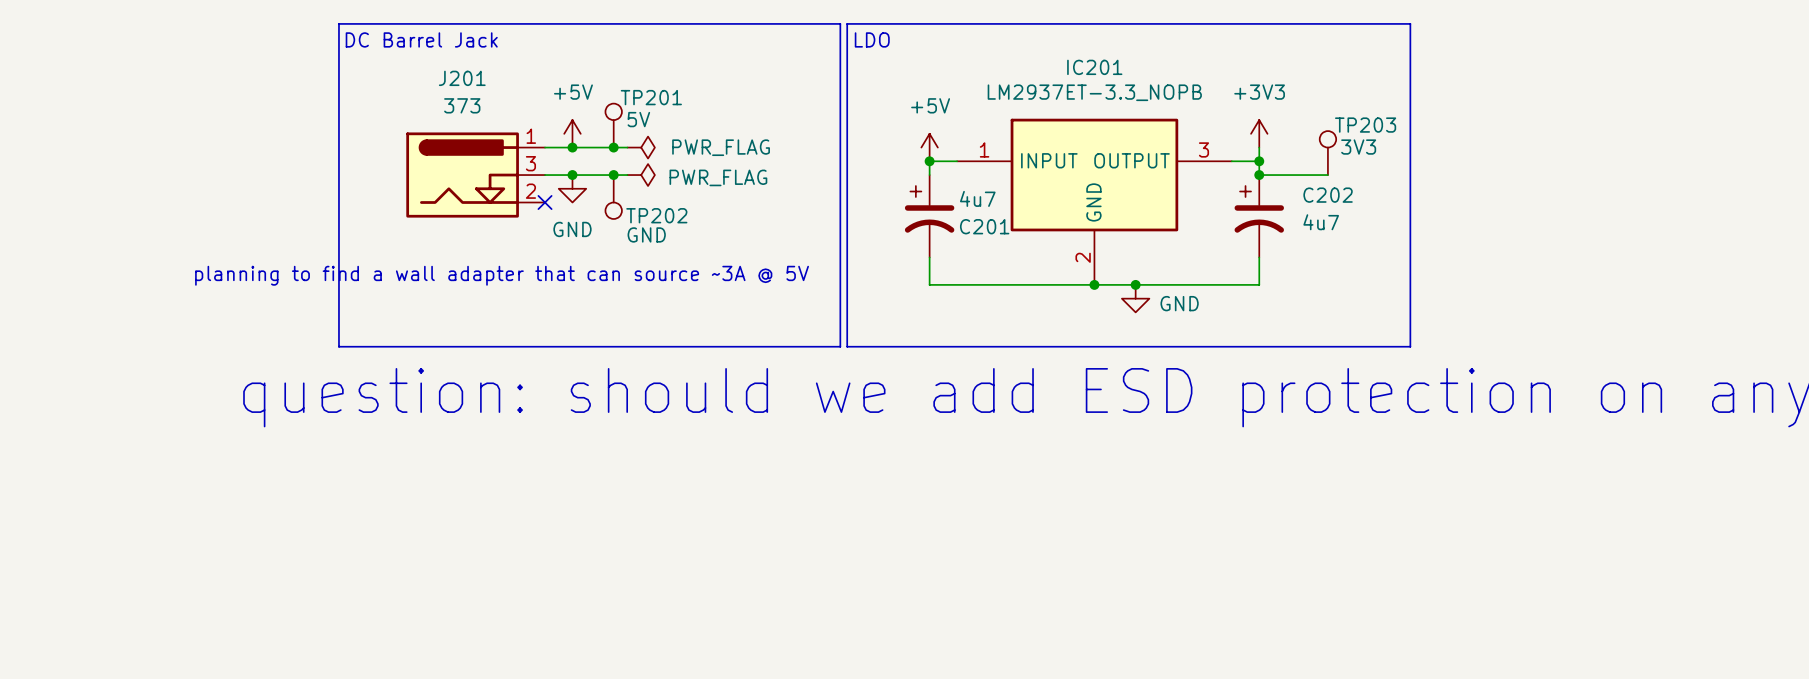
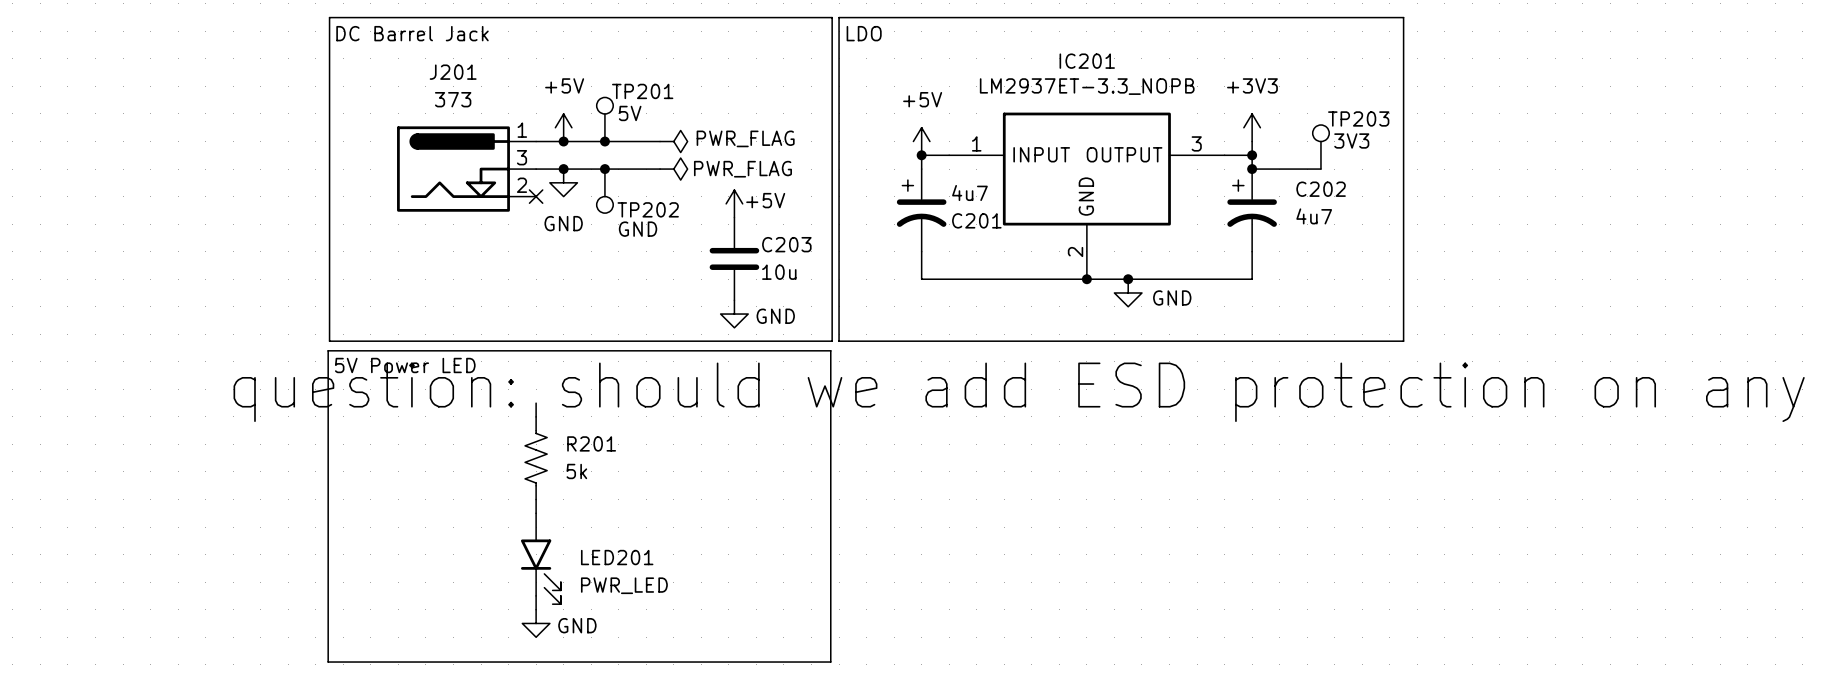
wire: none -> (618, 141) (660, 141)
power symbol: PWR_FLAG (641, 147) -> none
power symbol: none -> PWR_FLAG (673, 141)
wire: none -> (618, 169) (660, 169)
power symbol: PWR_FLAG (641, 175) -> none
power symbol: none -> PWR_FLAG (673, 169)
power symbol: none -> +5V (734, 203)
C203: none -> 10u (734, 258)
text: planning to find a wall adapter that can source ~3A @ 5V (502, 275) -> none
power symbol: none -> GND (734, 314)
line: none -> (328, 350) (830, 350) (830, 662) (328, 662) (328, 350)
text: none -> 5V Power LED (405, 365)
wire: none -> (536, 403) (536, 416)
R201: none -> 5k (536, 458)
wire: none -> (536, 499) (536, 513)
LED201: none -> PWR_LED (540, 558)
wire: none -> (536, 595) (536, 609)
power symbol: none -> GND (536, 623)

